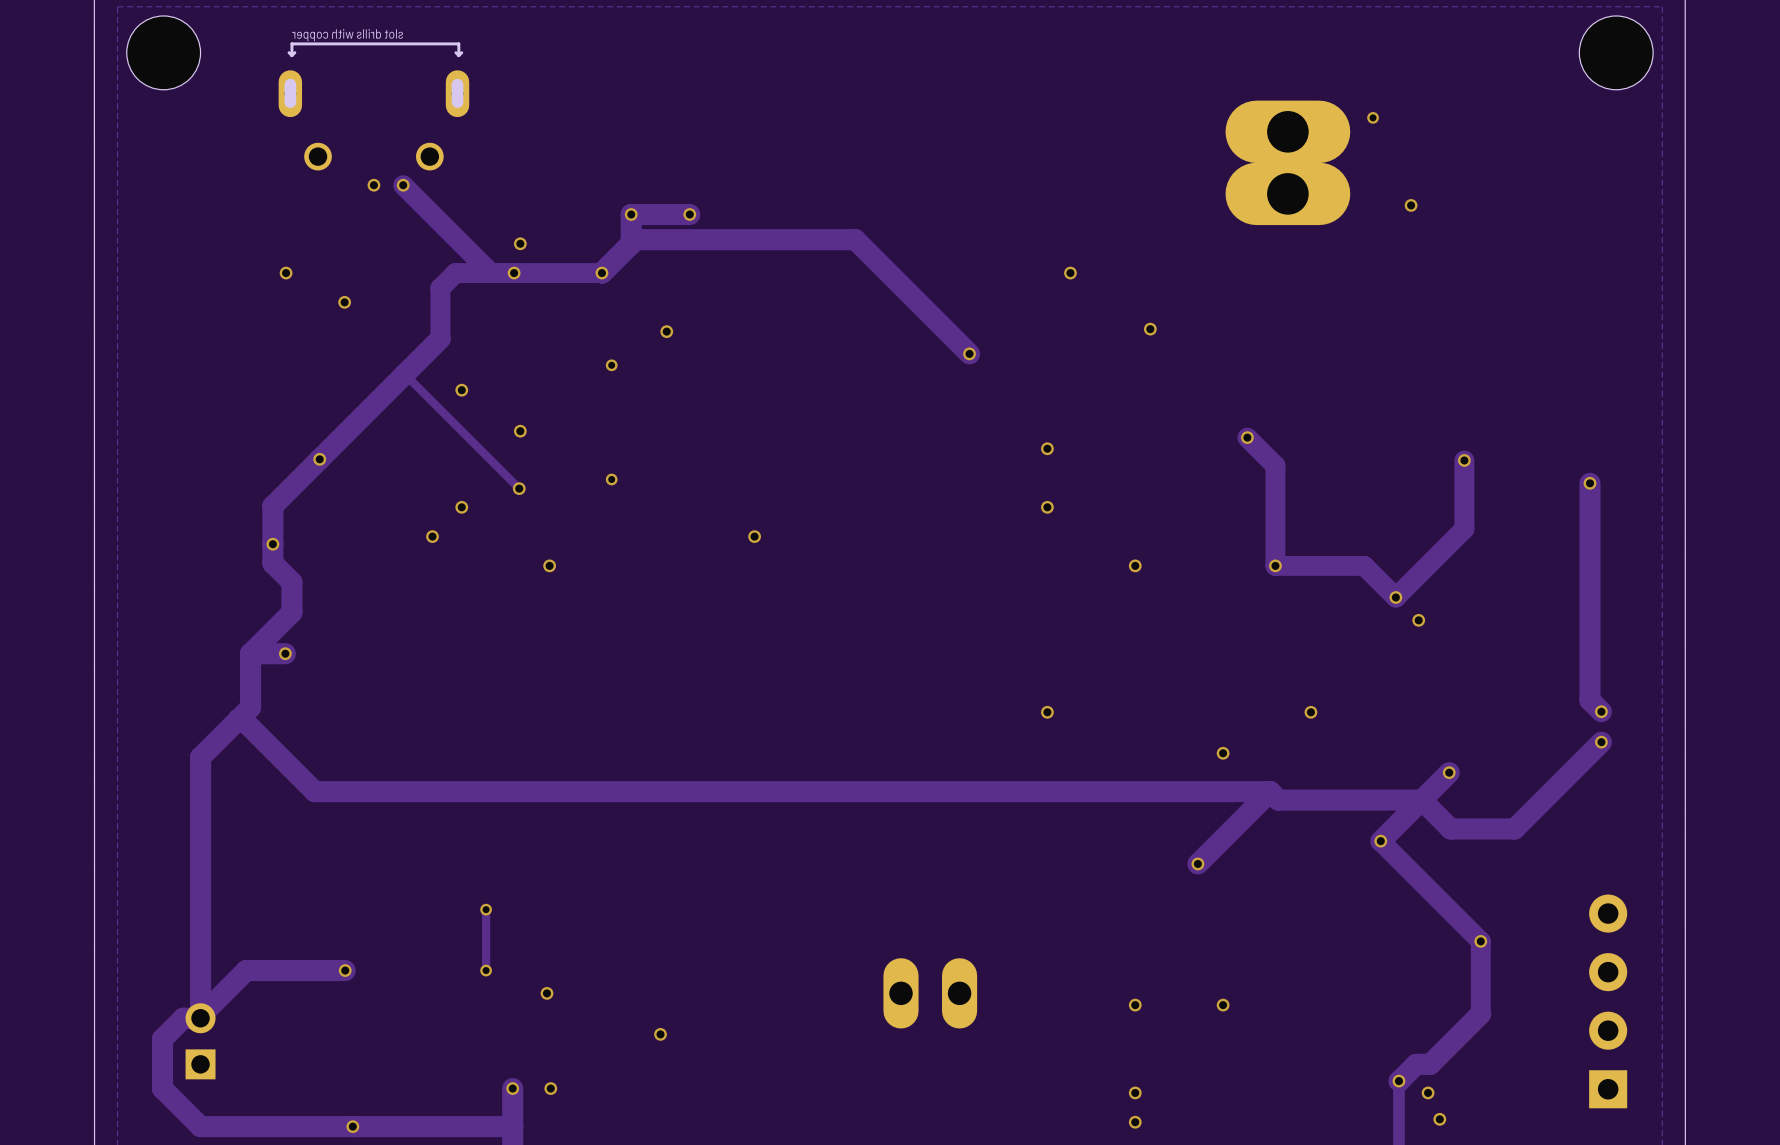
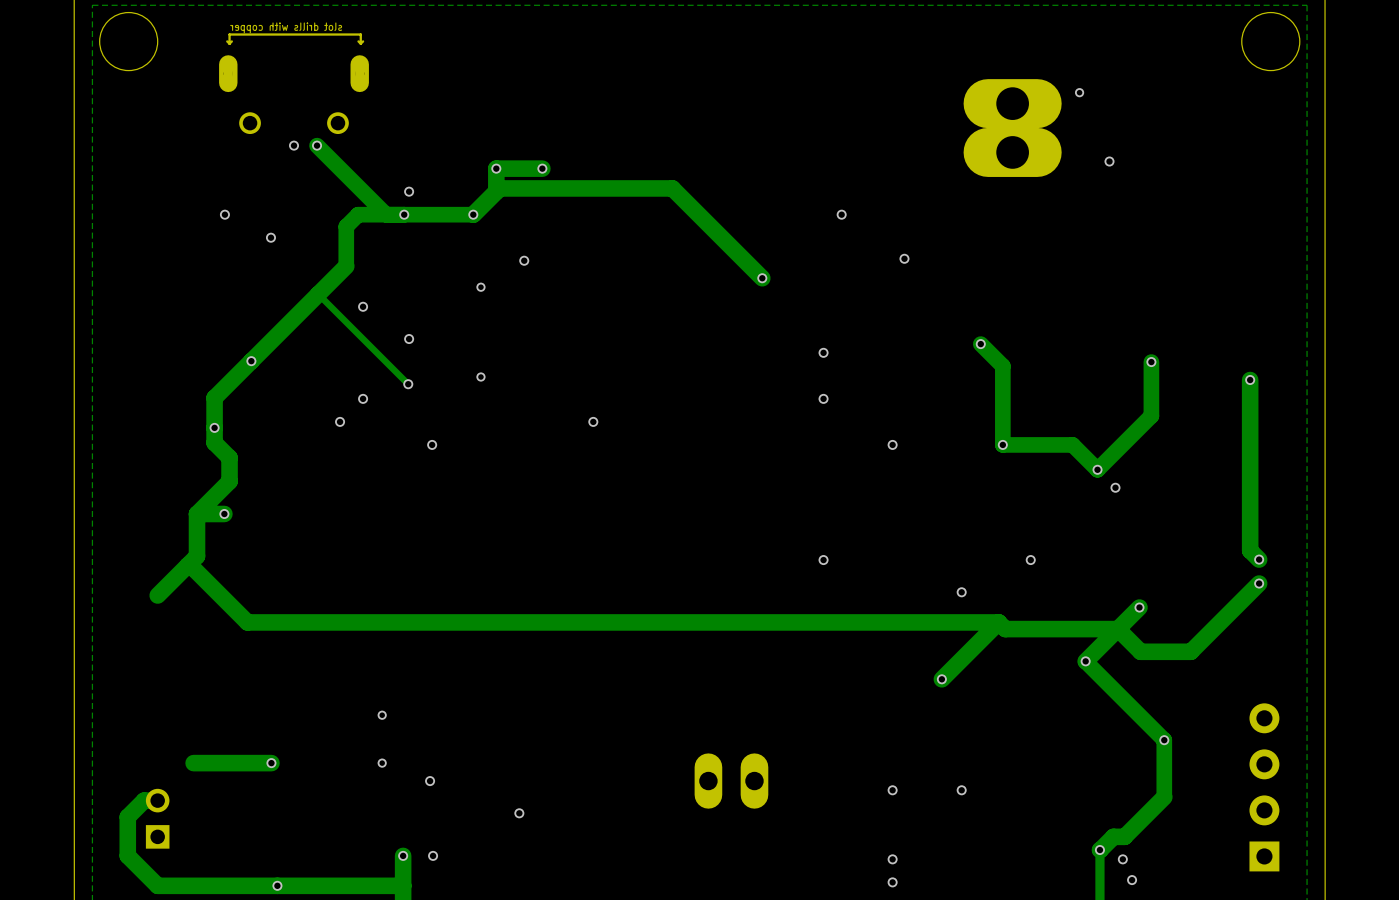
track: (200, 757) (200, 1016) (246, 970) -> none
track: (486, 909) (486, 970) -> none

